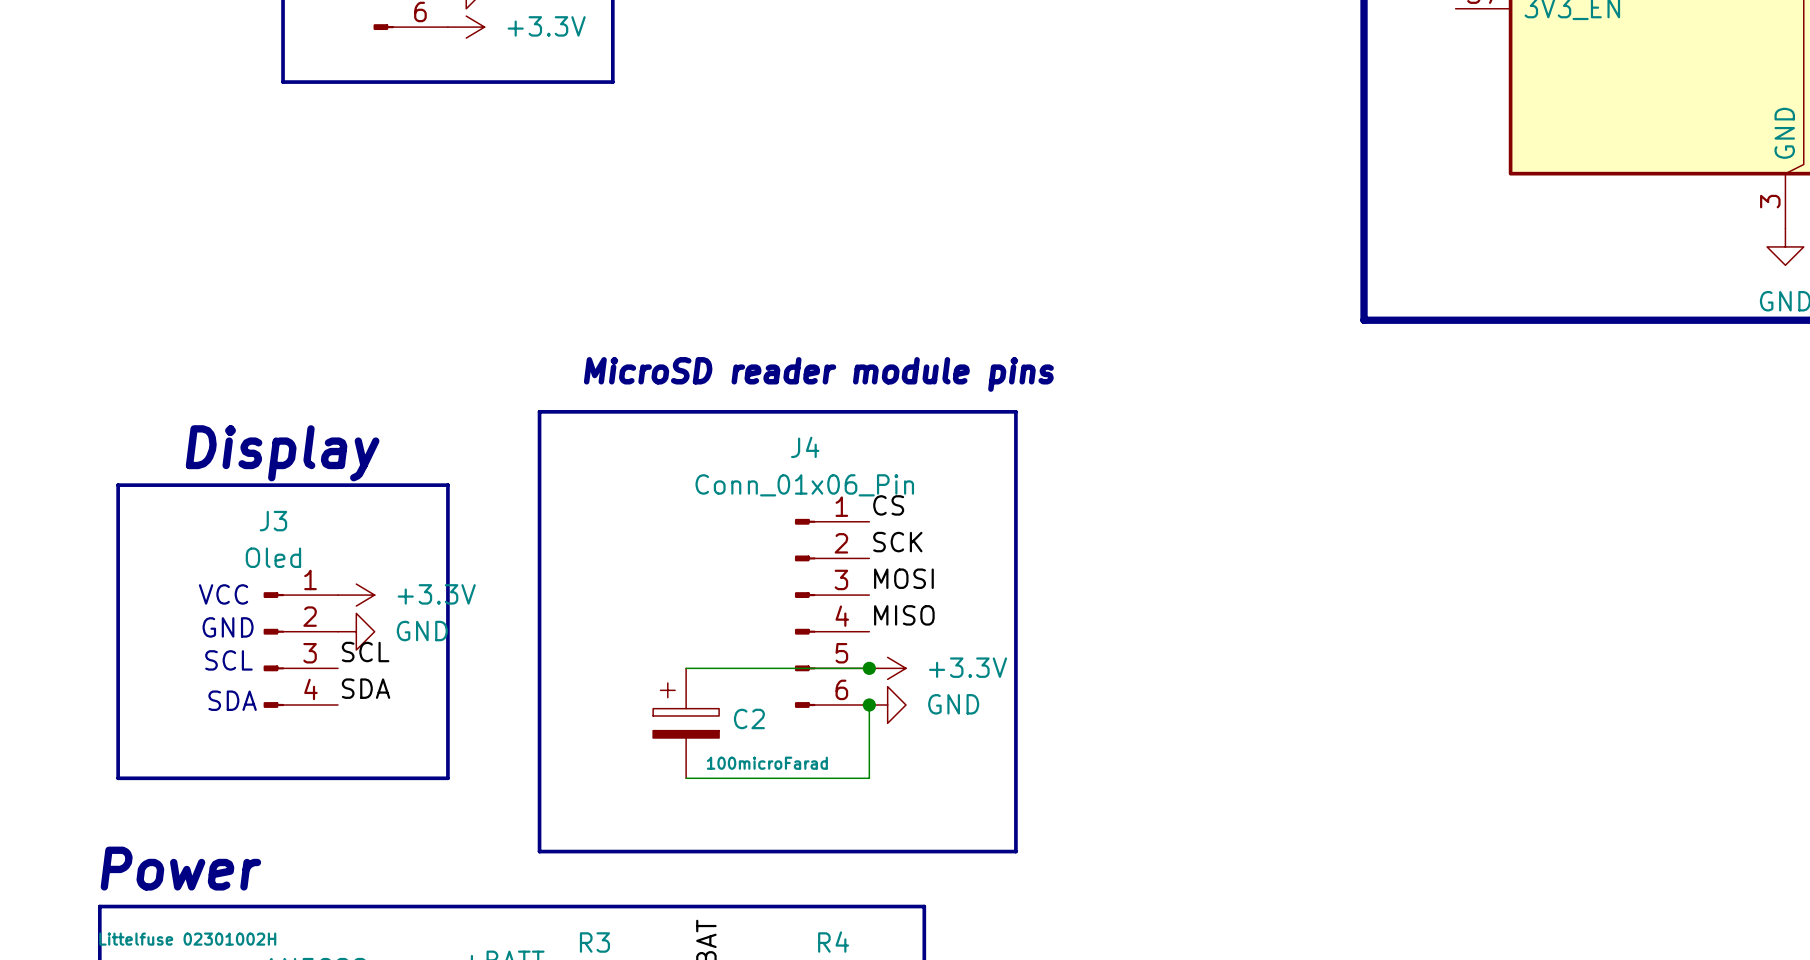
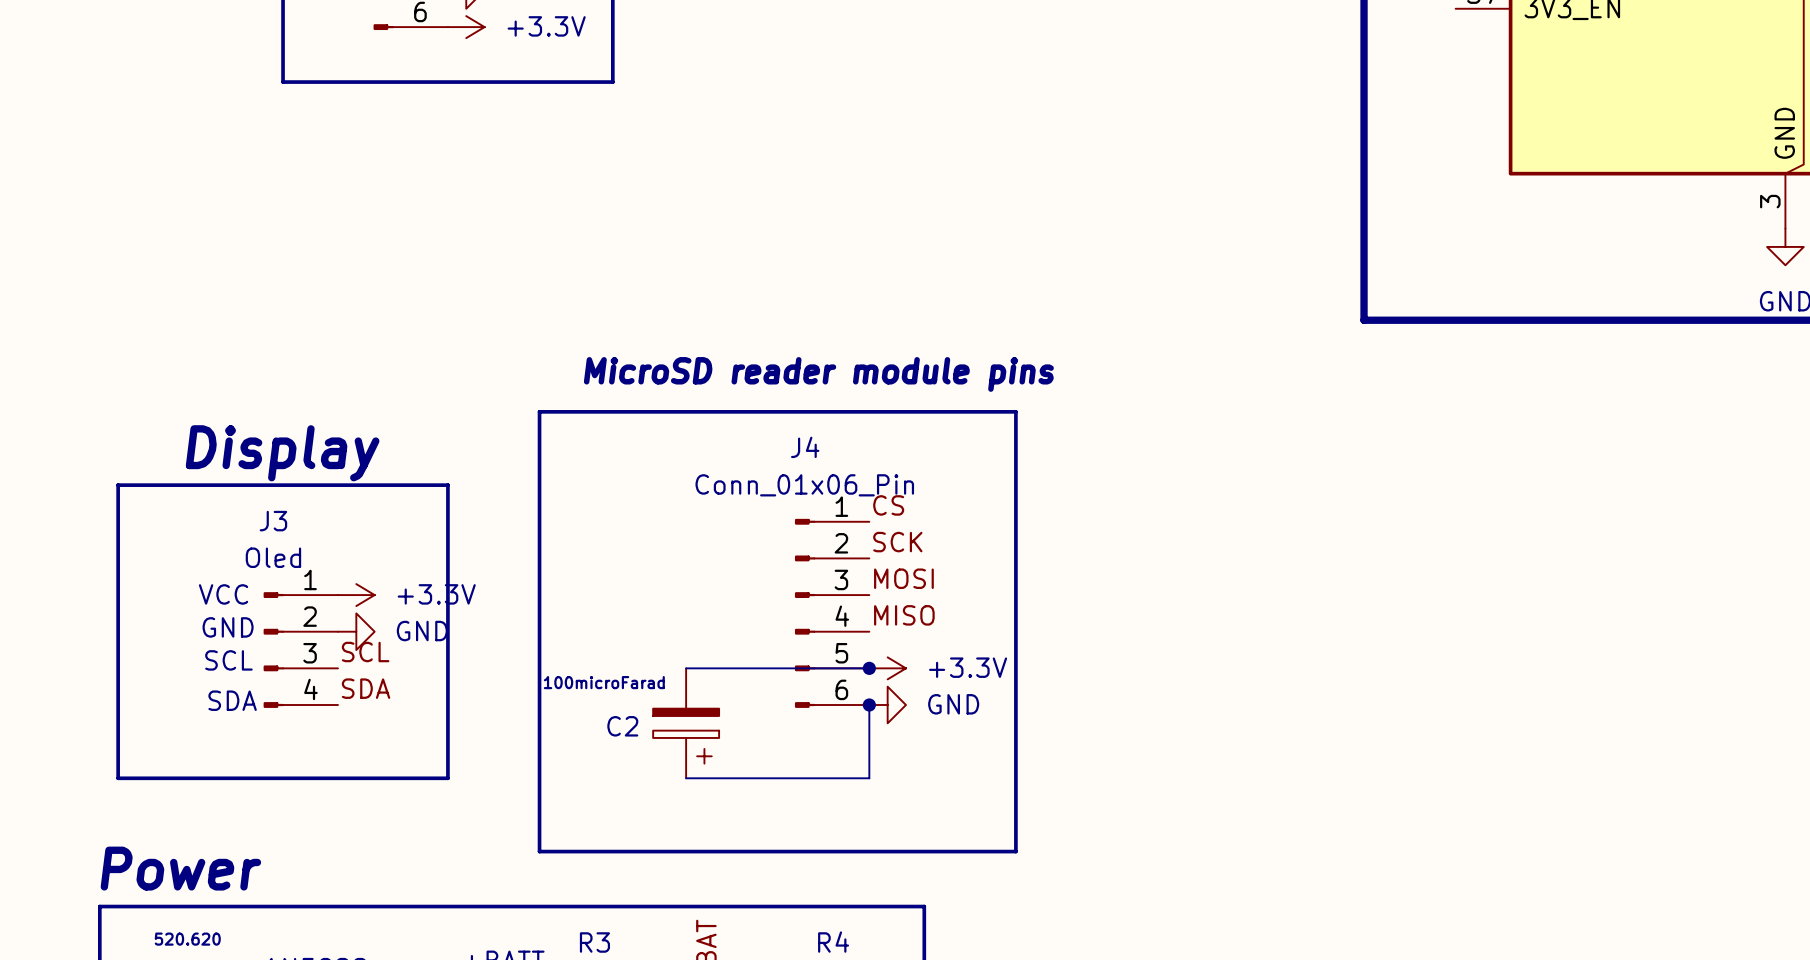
C2 rotation: 0° (686, 710) -> 180° (686, 736)
part value: Littelfuse 02301002H (187, 939) -> 520.620 (187, 939)

